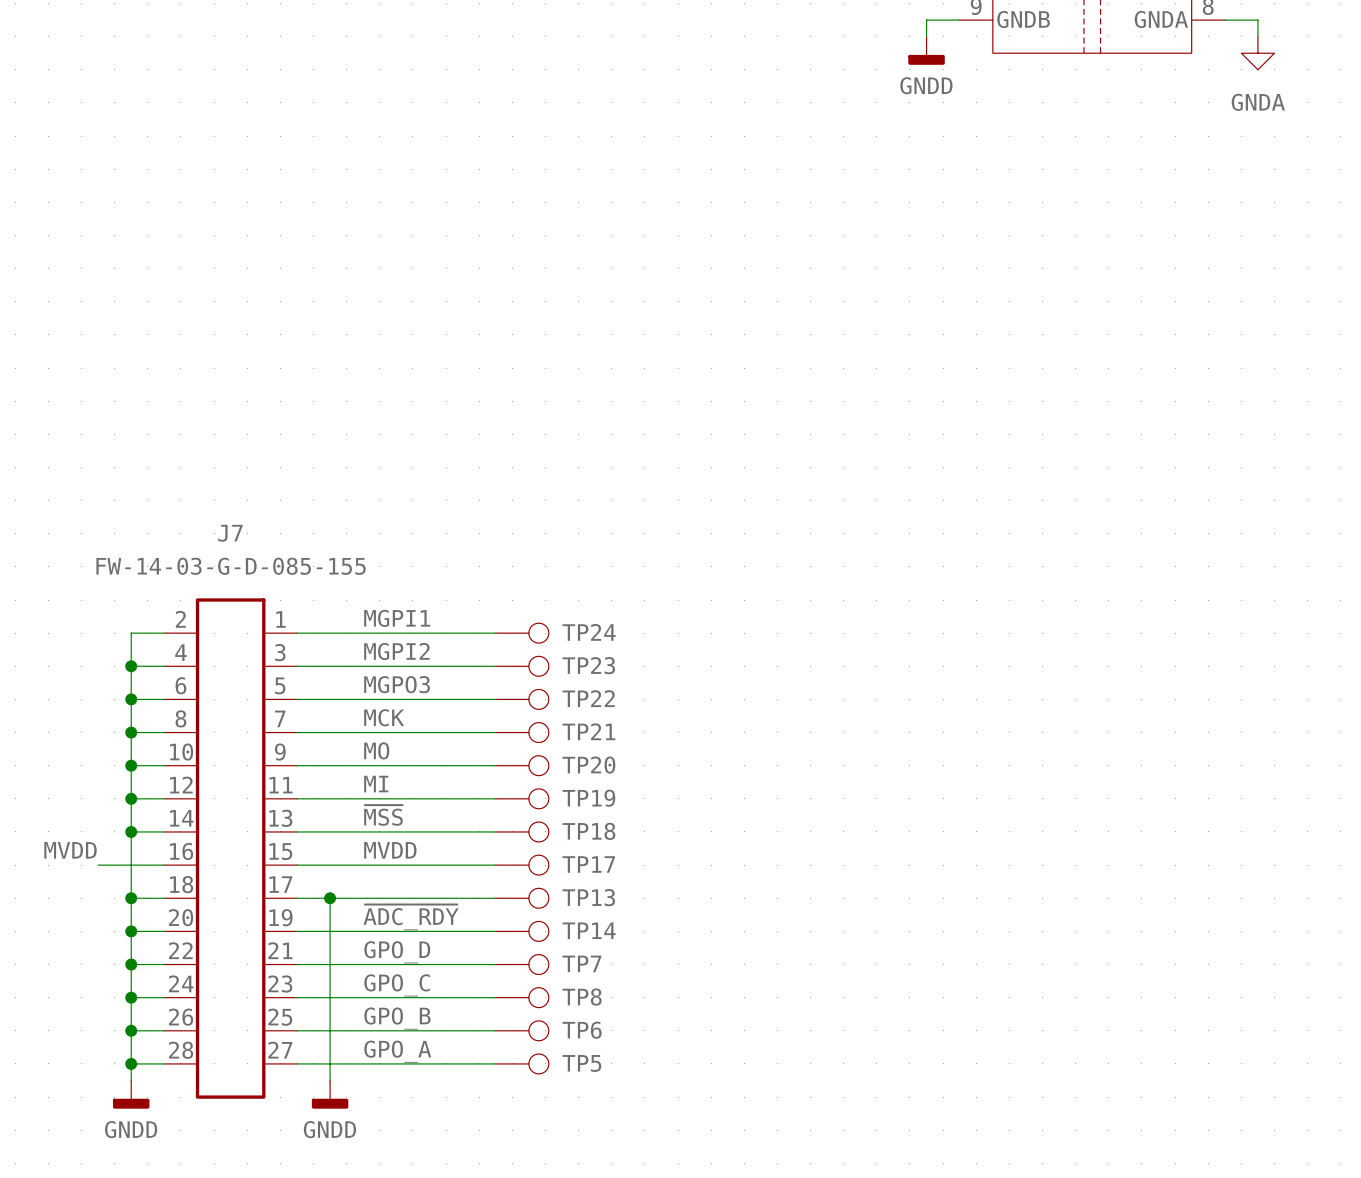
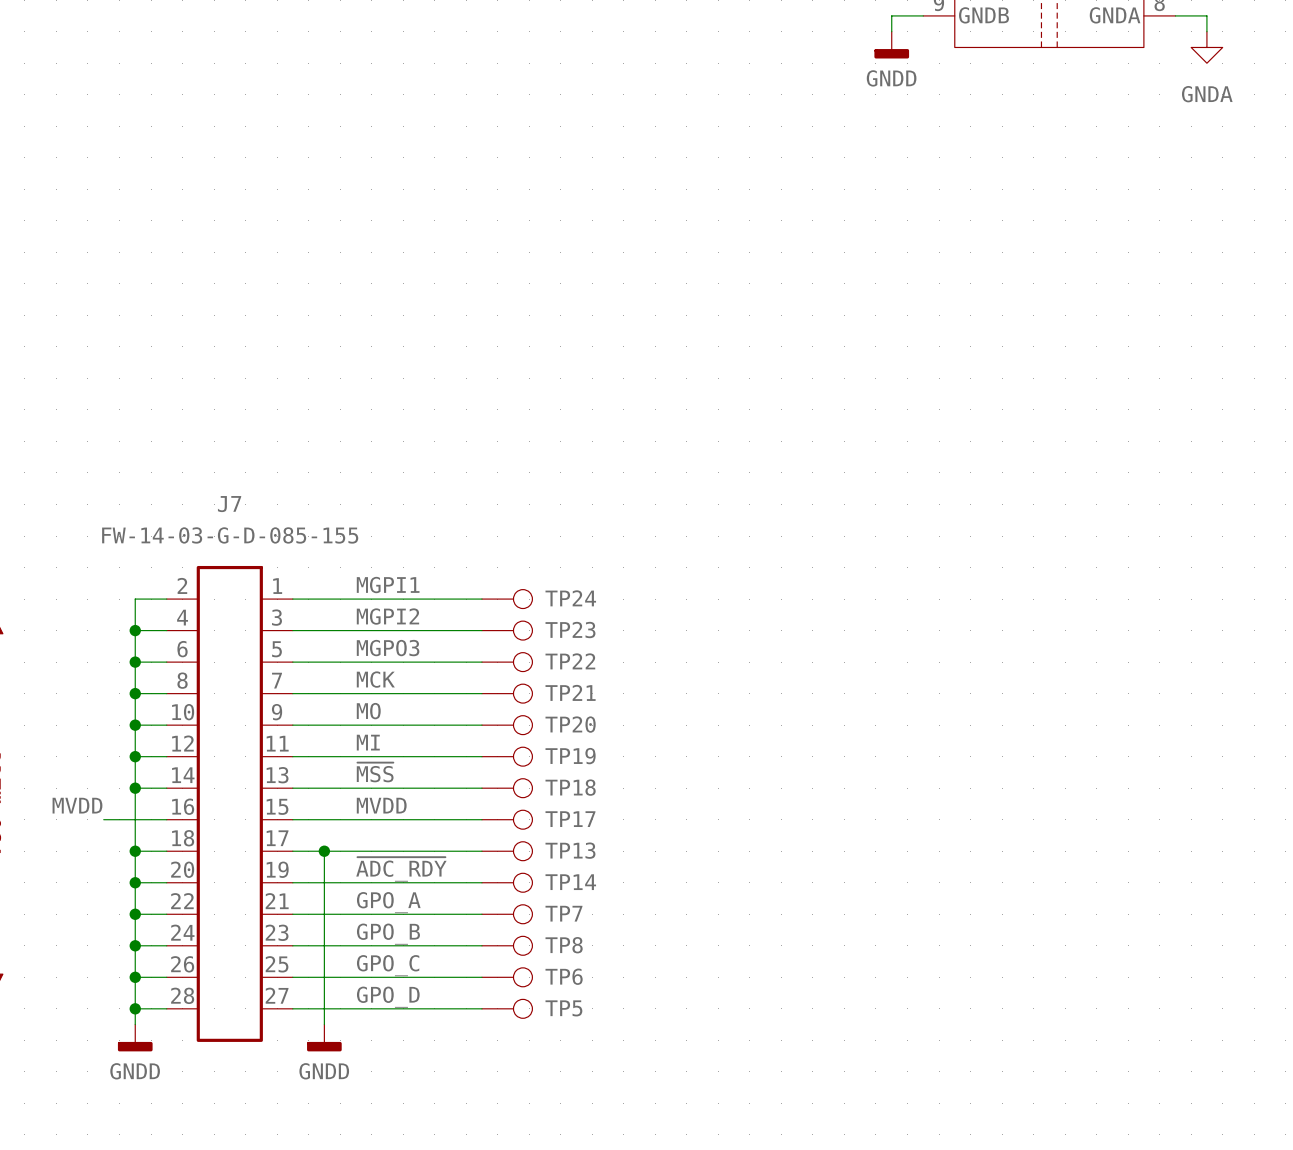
label: GPO_D (397, 952) -> GPO_A (388, 902)
label: GPO_C (397, 985) -> GPO_B (388, 934)
label: GPO_B (397, 1018) -> GPO_C (388, 965)
label: GPO_A (397, 1051) -> GPO_D (388, 997)

